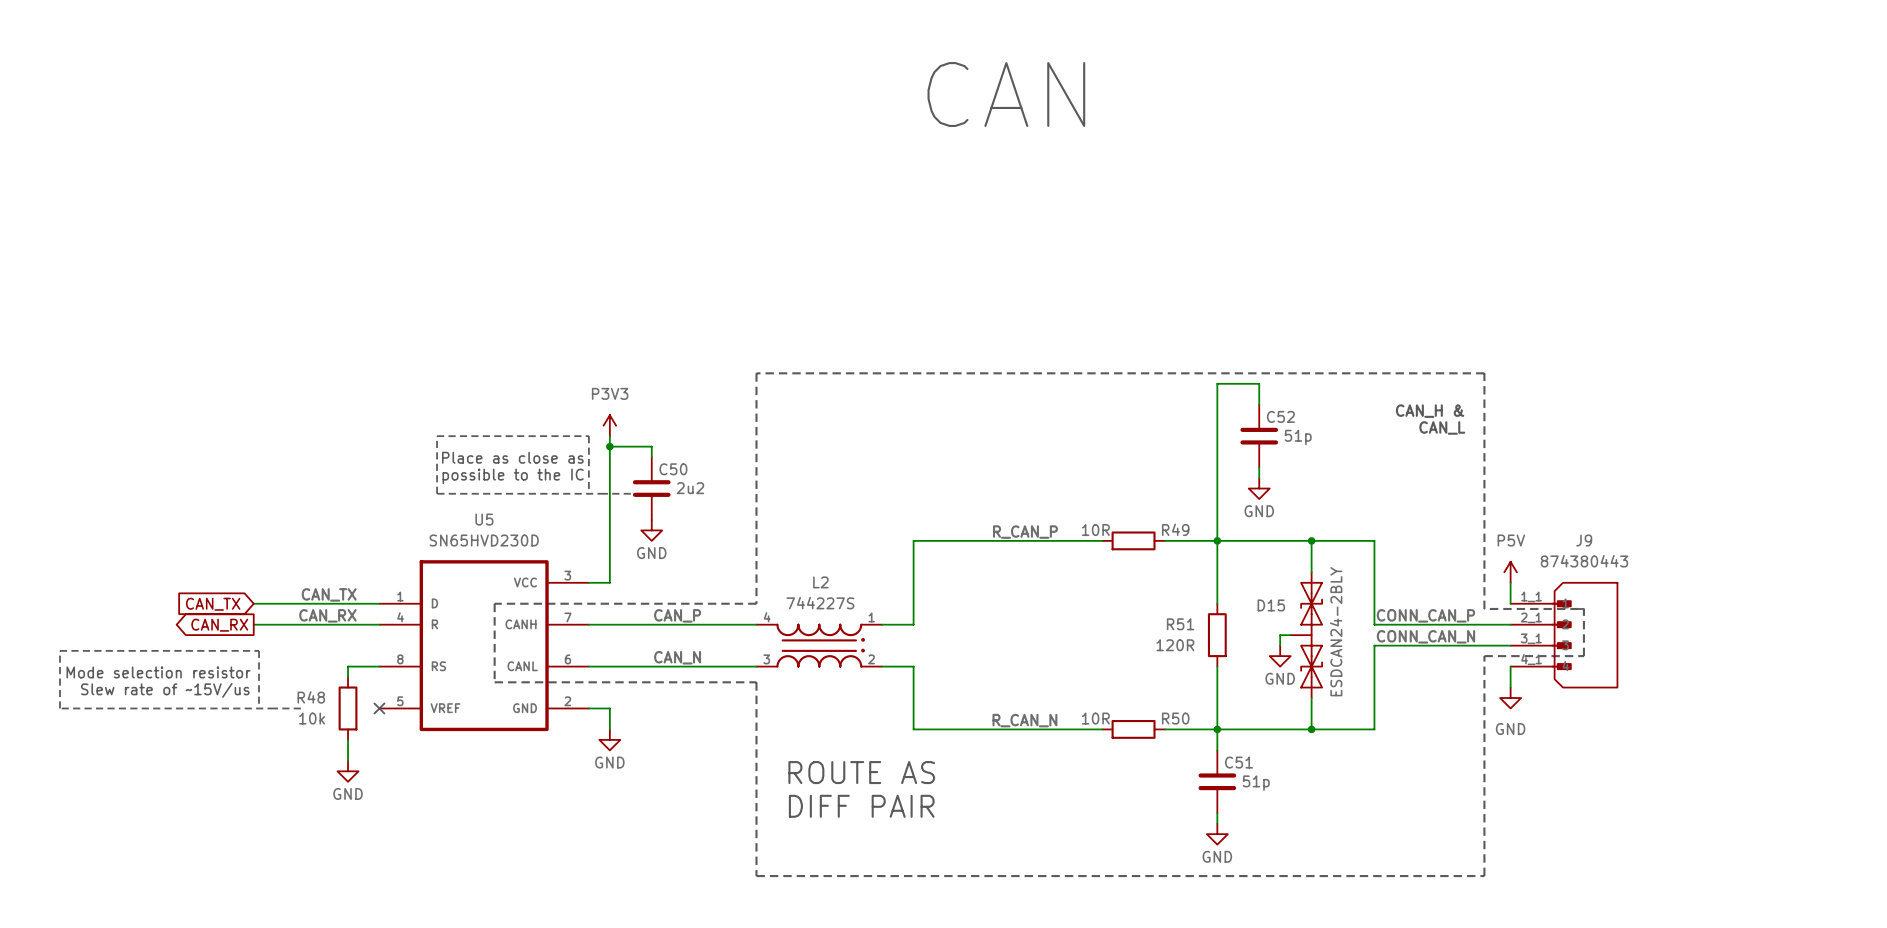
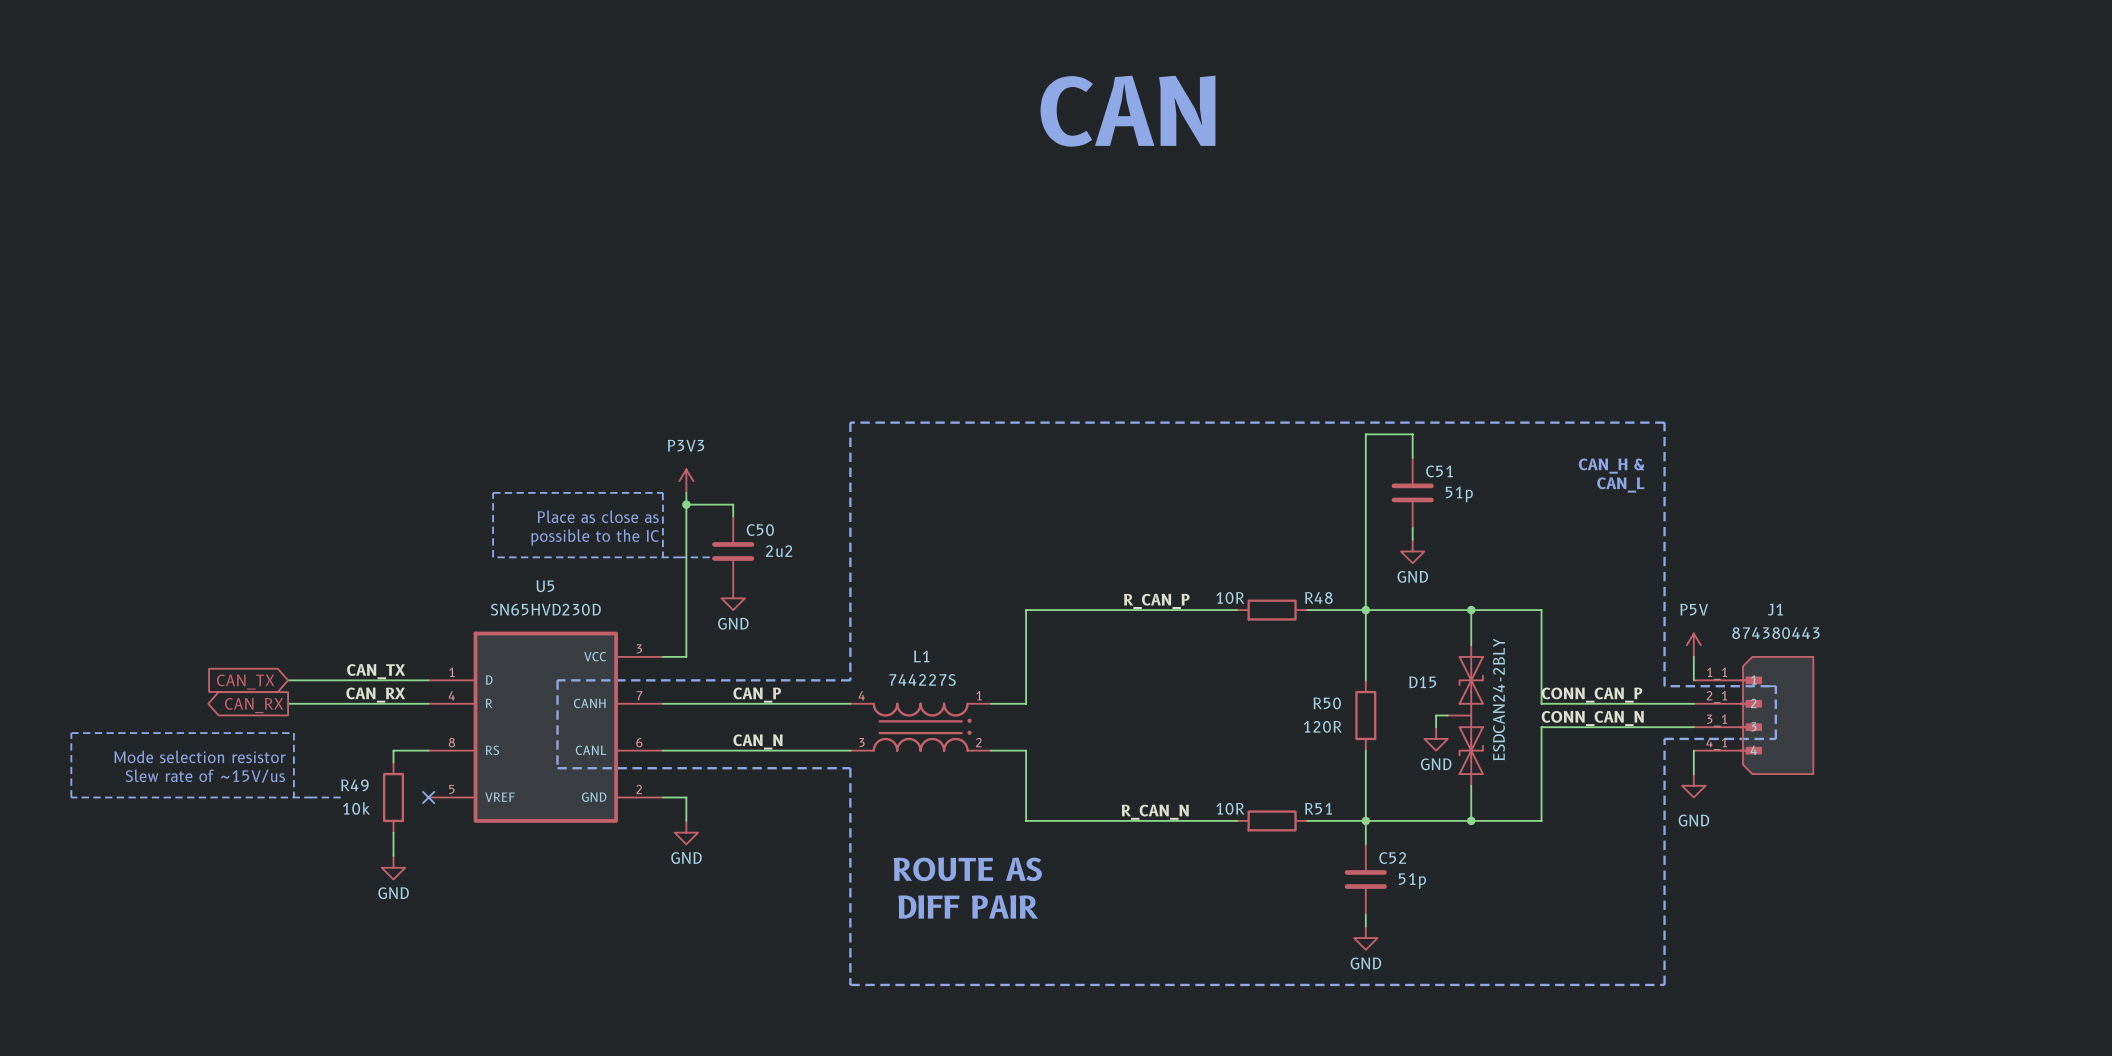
C52 name: C52 (1280, 416) -> C51 (1439, 471)
R49 name: R49 (1175, 529) -> R48 (1318, 597)
J9 name: J9 (1584, 540) -> J1 (1775, 609)
L2 name: L2 (820, 582) -> L1 (921, 656)
R51 name: R51 (1180, 624) -> R50 (1327, 703)
R48 name: R48 (311, 697) -> R49 (354, 785)
R50 name: R50 (1175, 718) -> R51 (1318, 808)
C51 name: C51 (1239, 762) -> C52 (1392, 858)

